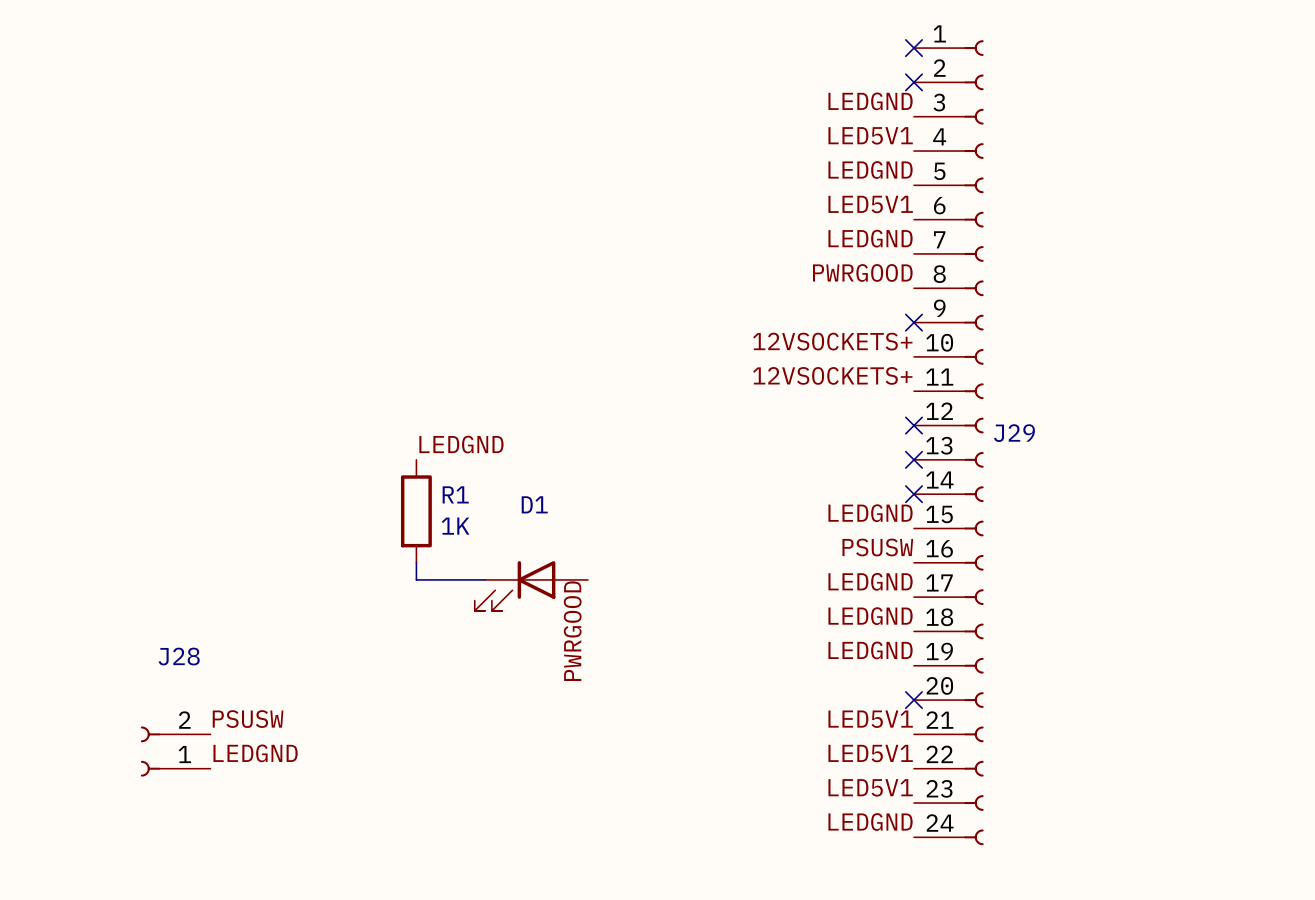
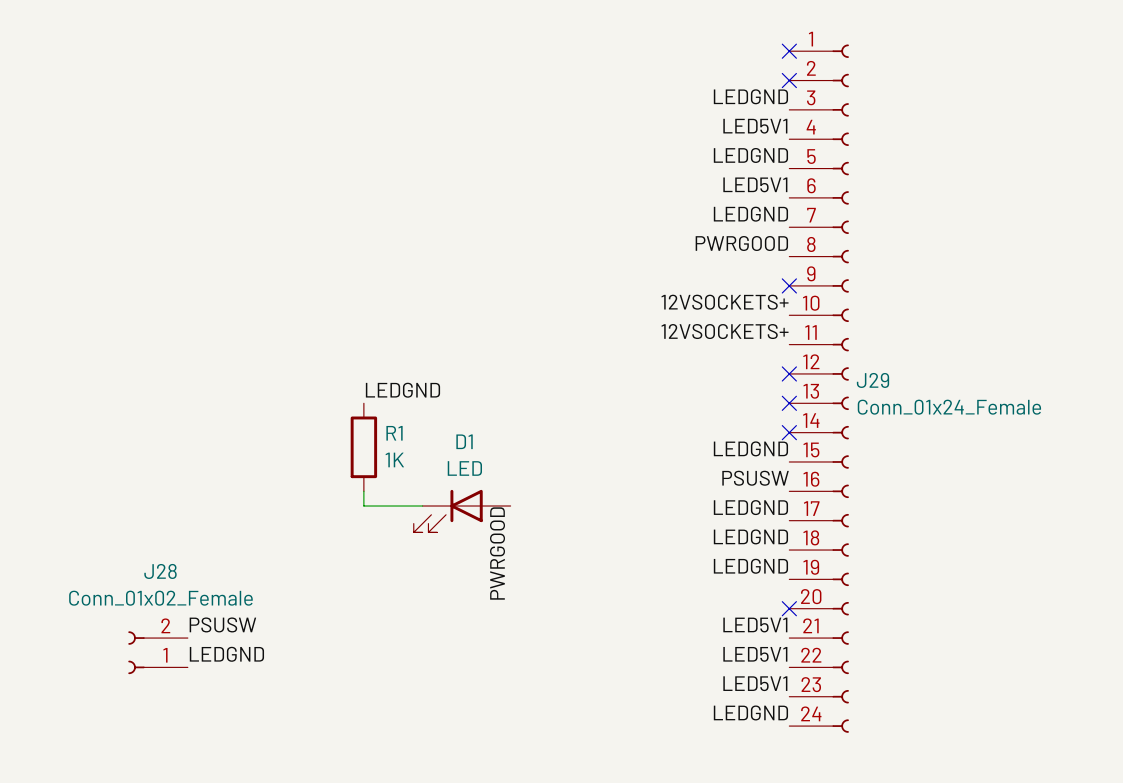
J29 value: none -> Conn_01x24_Female (949, 407)
D1 value: none -> LED (464, 468)
J28 value: none -> Conn_01x02_Female (160, 598)

